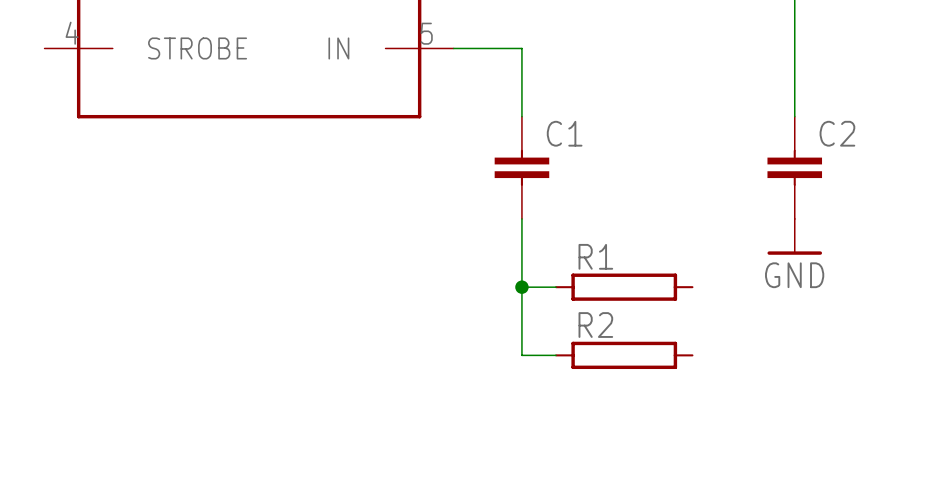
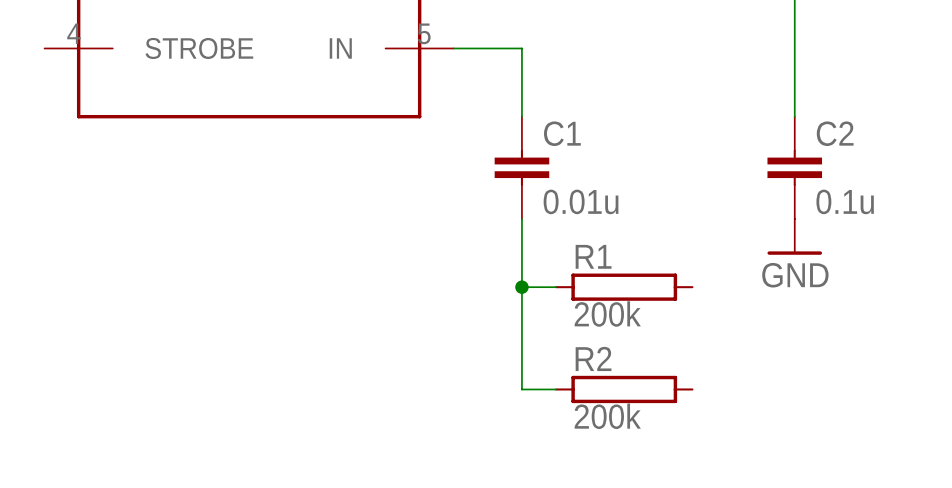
C1 value: none -> 0.01u (581, 201)
C2 value: none -> 0.1u (845, 201)
R1 value: none -> 200k (607, 313)
wire: (521, 355) (556, 355) -> (521, 355) (521, 389) (556, 389)
R2 position: (624, 355) -> (624, 389)
R2 value: none -> 200k (607, 416)

